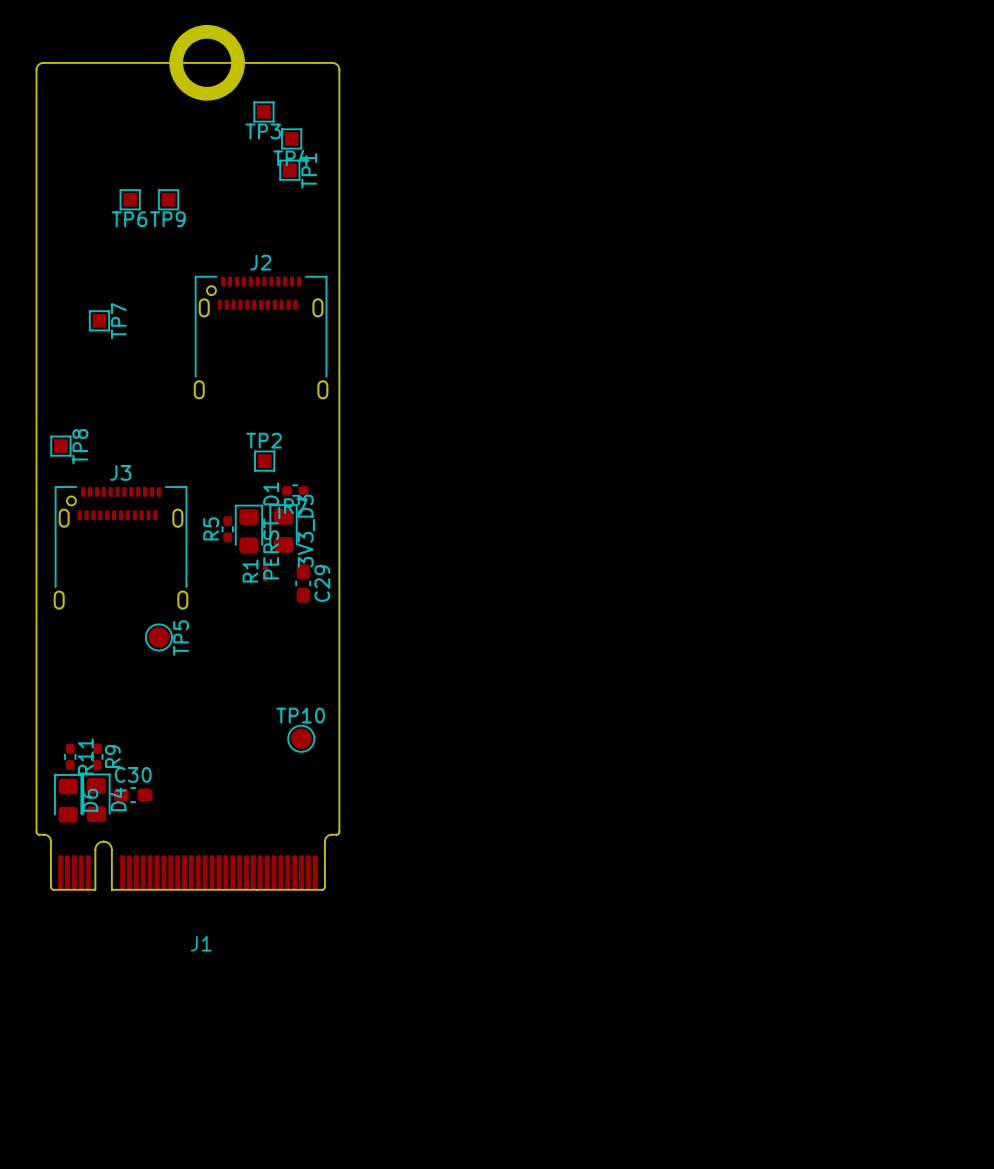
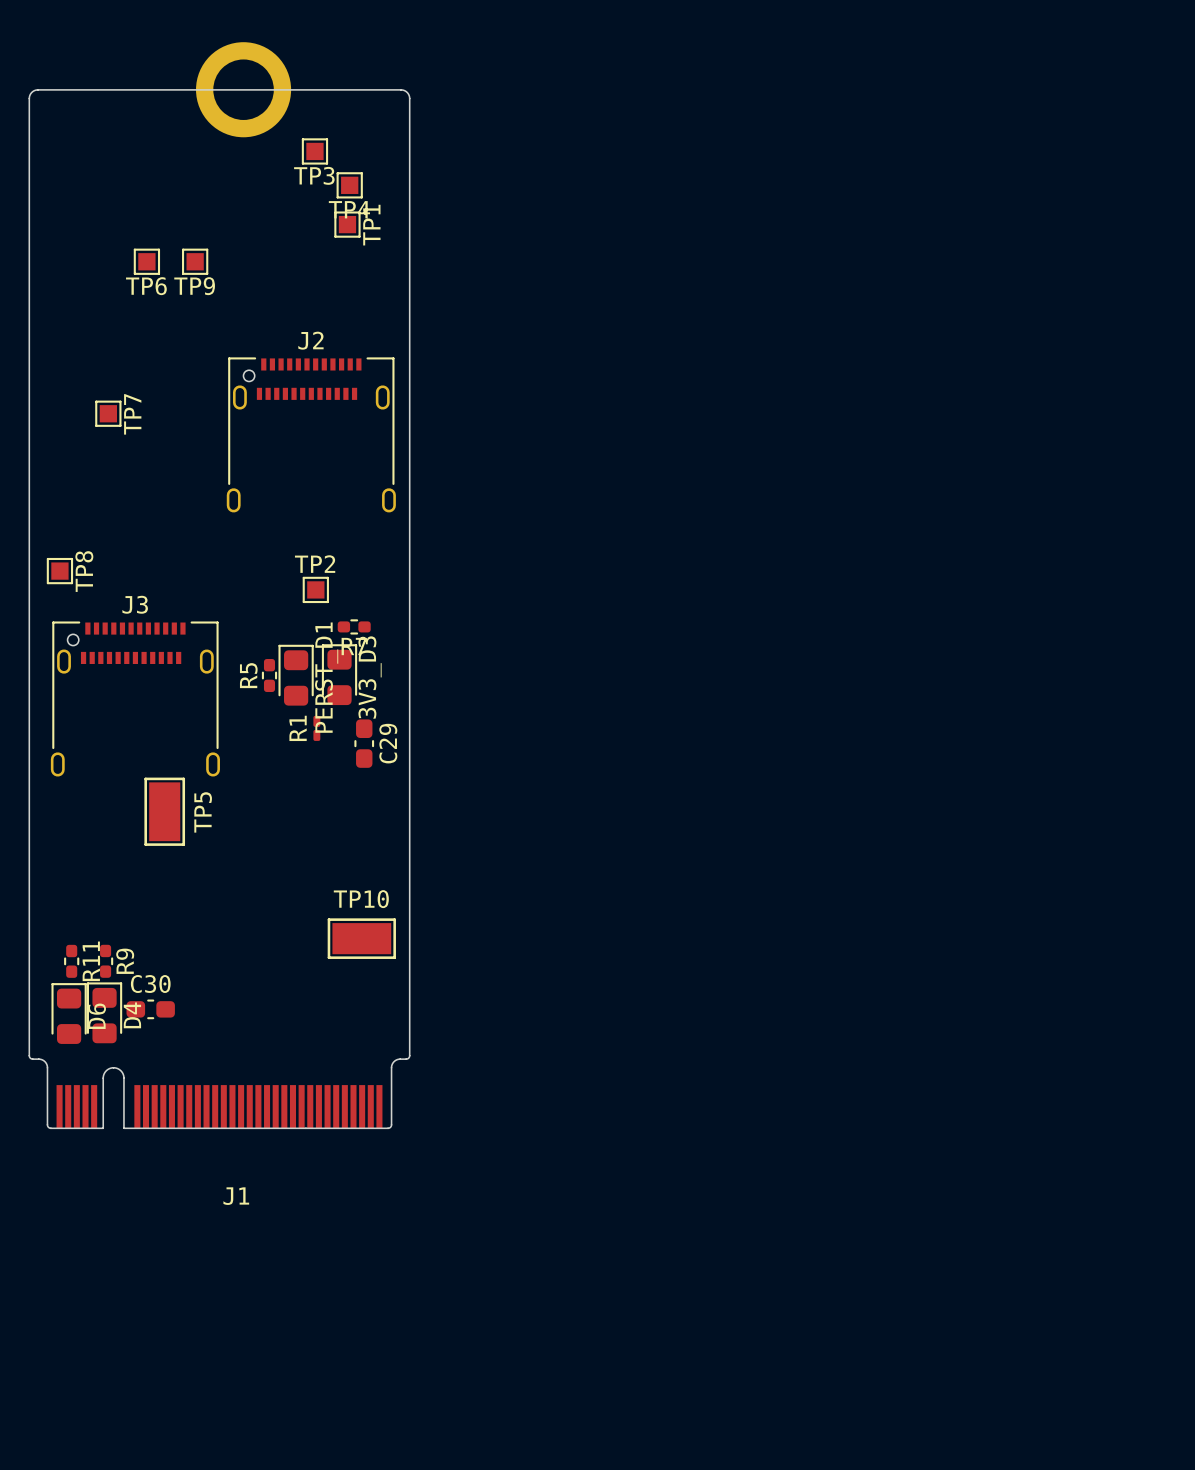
TP5 footprint: [145, 623, 173, 652] -> [144, 777, 186, 846]
TP10 footprint: [287, 724, 316, 753] -> [327, 918, 396, 959]

